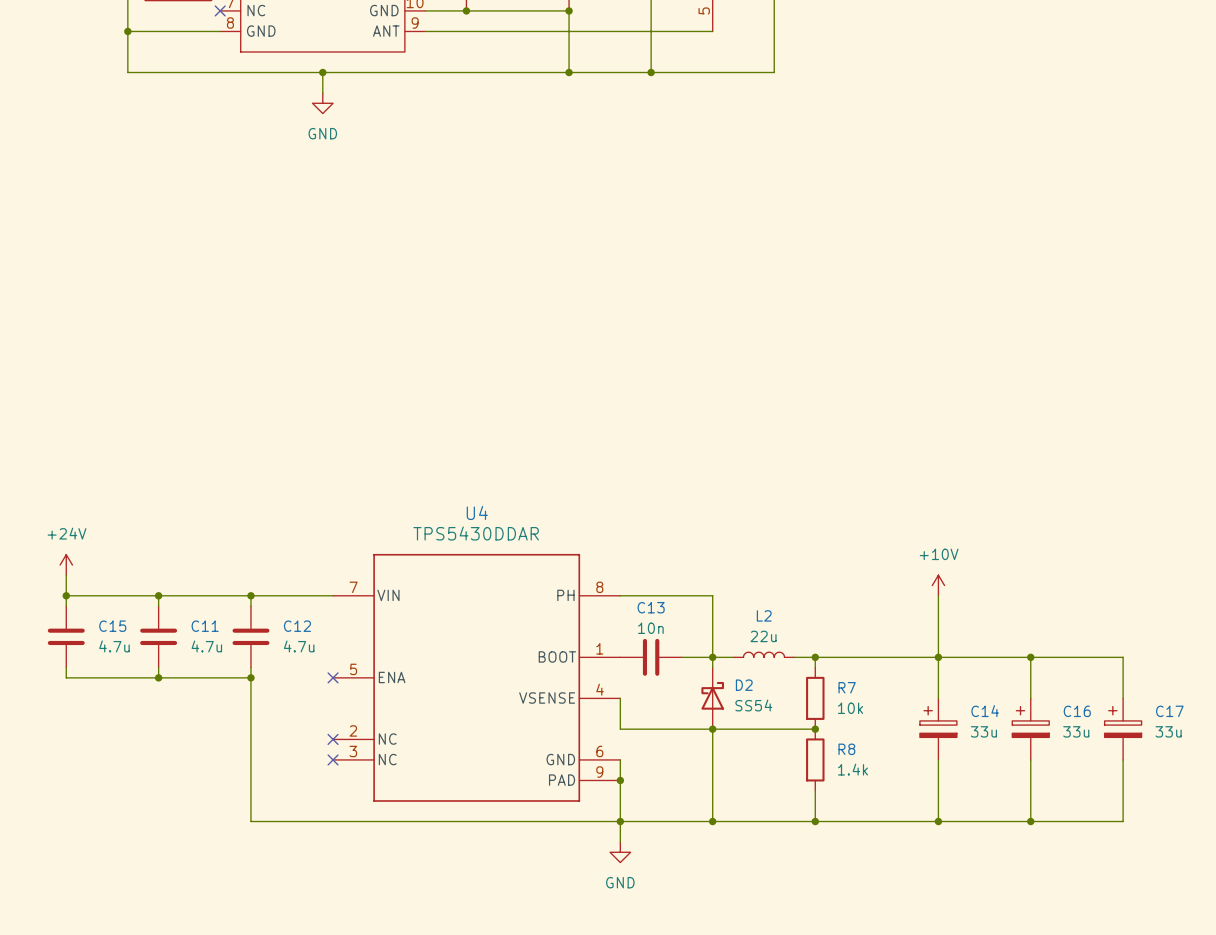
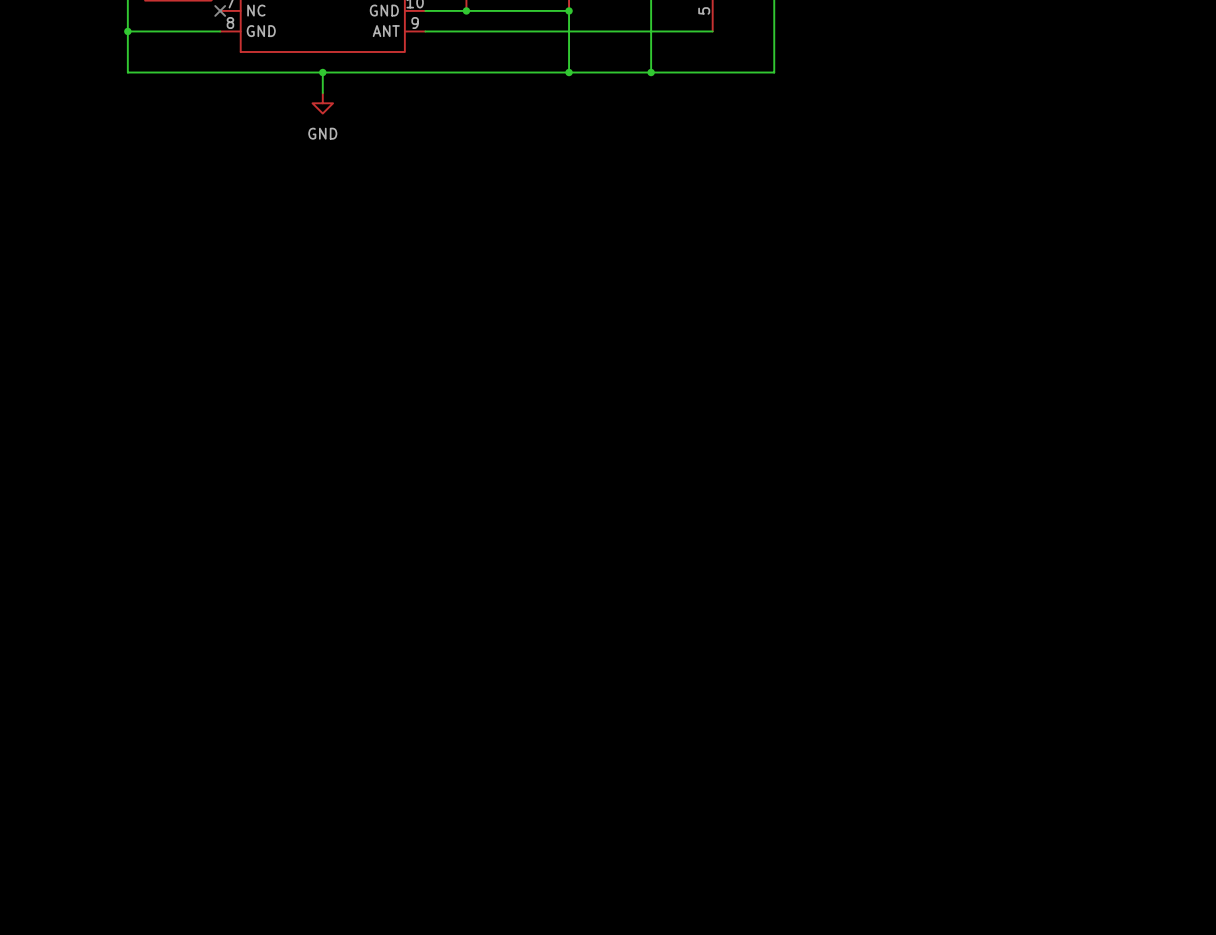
power symbol: +24V (66, 565) -> none
wire: (66, 575) (66, 606) -> none
power symbol: +10V (938, 585) -> none
wire: (66, 595) (333, 595) -> none
junction: (66, 595) -> none
wire: (158, 595) (158, 606) -> none
junction: (158, 595) -> none
wire: (250, 595) (250, 606) -> none
junction: (250, 595) -> none
wire: (620, 595) (712, 595) (712, 667) -> none
wire: (938, 595) (938, 698) -> none
C15: 4.7u (66, 636) -> none
C11: 4.7u (158, 636) -> none
C12: 4.7u (250, 636) -> none
L2: 22u (763, 654) -> none
C13: 10n (651, 657) -> none
wire: (681, 657) (733, 657) -> none
junction: (712, 657) -> none
wire: (794, 657) (1123, 657) (1123, 698) -> none
wire: (815, 657) (815, 667) -> none
junction: (815, 657) -> none
junction: (938, 657) -> none
wire: (1030, 657) (1030, 698) -> none
junction: (1030, 657) -> none
wire: (66, 667) (66, 677) (250, 677) -> none
wire: (158, 667) (158, 677) -> none
wire: (250, 667) (250, 821) (1123, 821) (1123, 759) -> none
junction: (158, 677) -> none
junction: (250, 677) -> none
no-connect mark: (333, 677) -> none
U4: TPS5430DDAR (476, 677) -> none
wire: (620, 698) (620, 729) (815, 729) -> none
D2: SS54 (712, 698) -> none
R7: 10k (815, 698) -> none
wire: (712, 729) (712, 821) -> none
junction: (712, 729) -> none
junction: (815, 729) -> none
C14: 33u (938, 729) -> none
C16: 33u (1030, 729) -> none
C17: 33u (1123, 729) -> none
no-connect mark: (333, 739) -> none
no-connect mark: (333, 759) -> none
wire: (620, 759) (620, 842) -> none
R8: 1.4k (815, 759) -> none
wire: (938, 759) (938, 821) -> none
wire: (1030, 759) (1030, 821) -> none
junction: (620, 780) -> none
wire: (815, 790) (815, 821) -> none
junction: (620, 821) -> none
junction: (712, 821) -> none
junction: (815, 821) -> none
junction: (938, 821) -> none
junction: (1030, 821) -> none
power symbol: GND (620, 852) -> none

